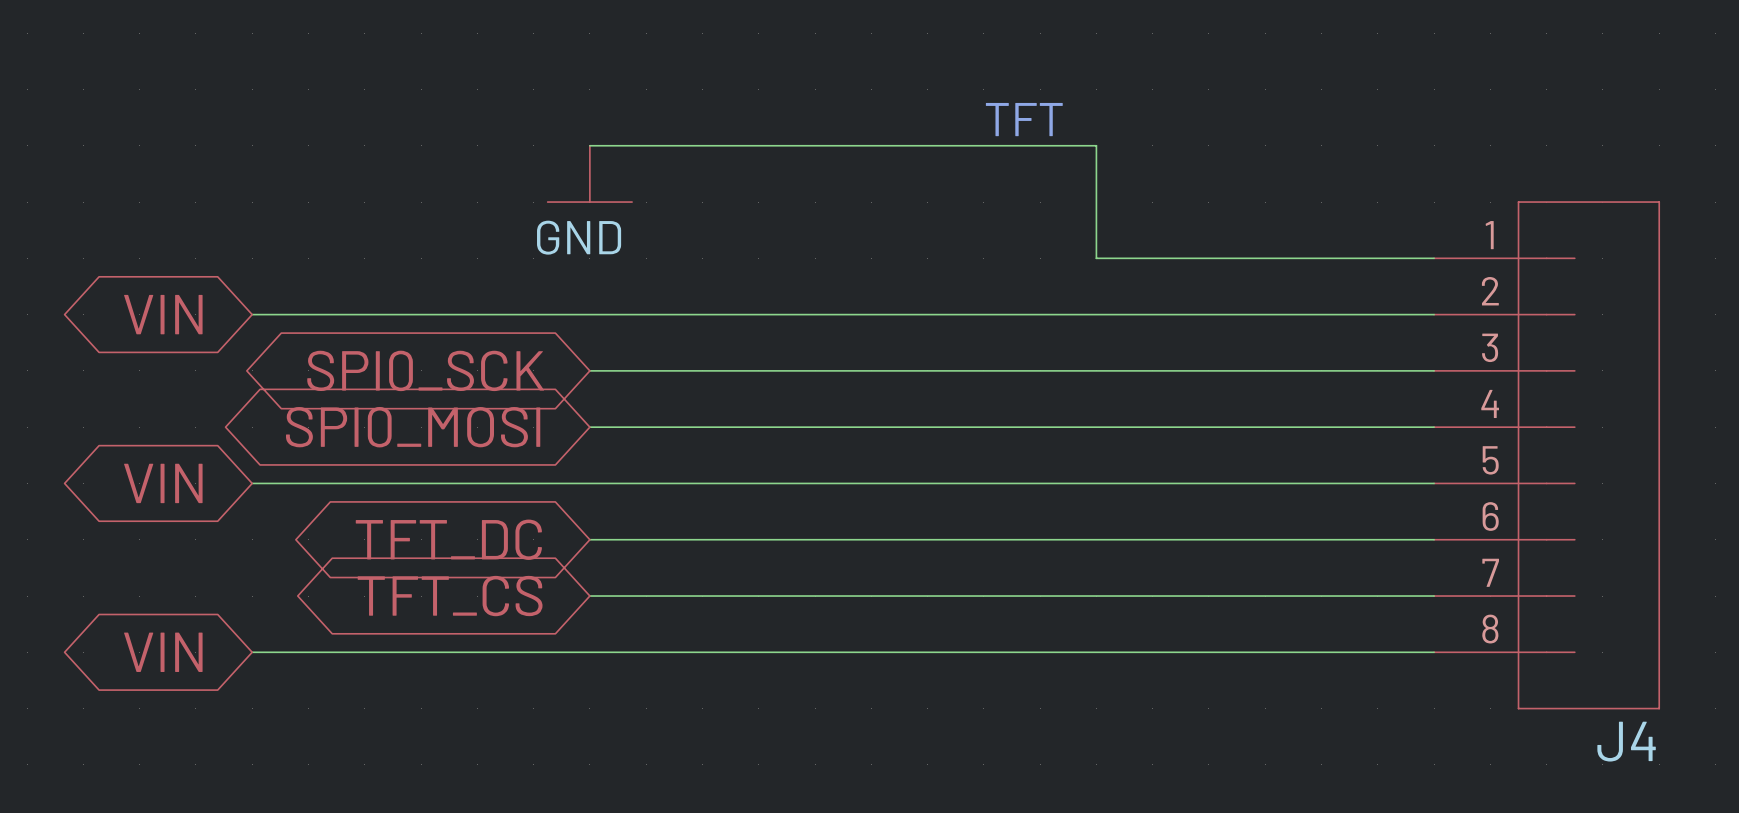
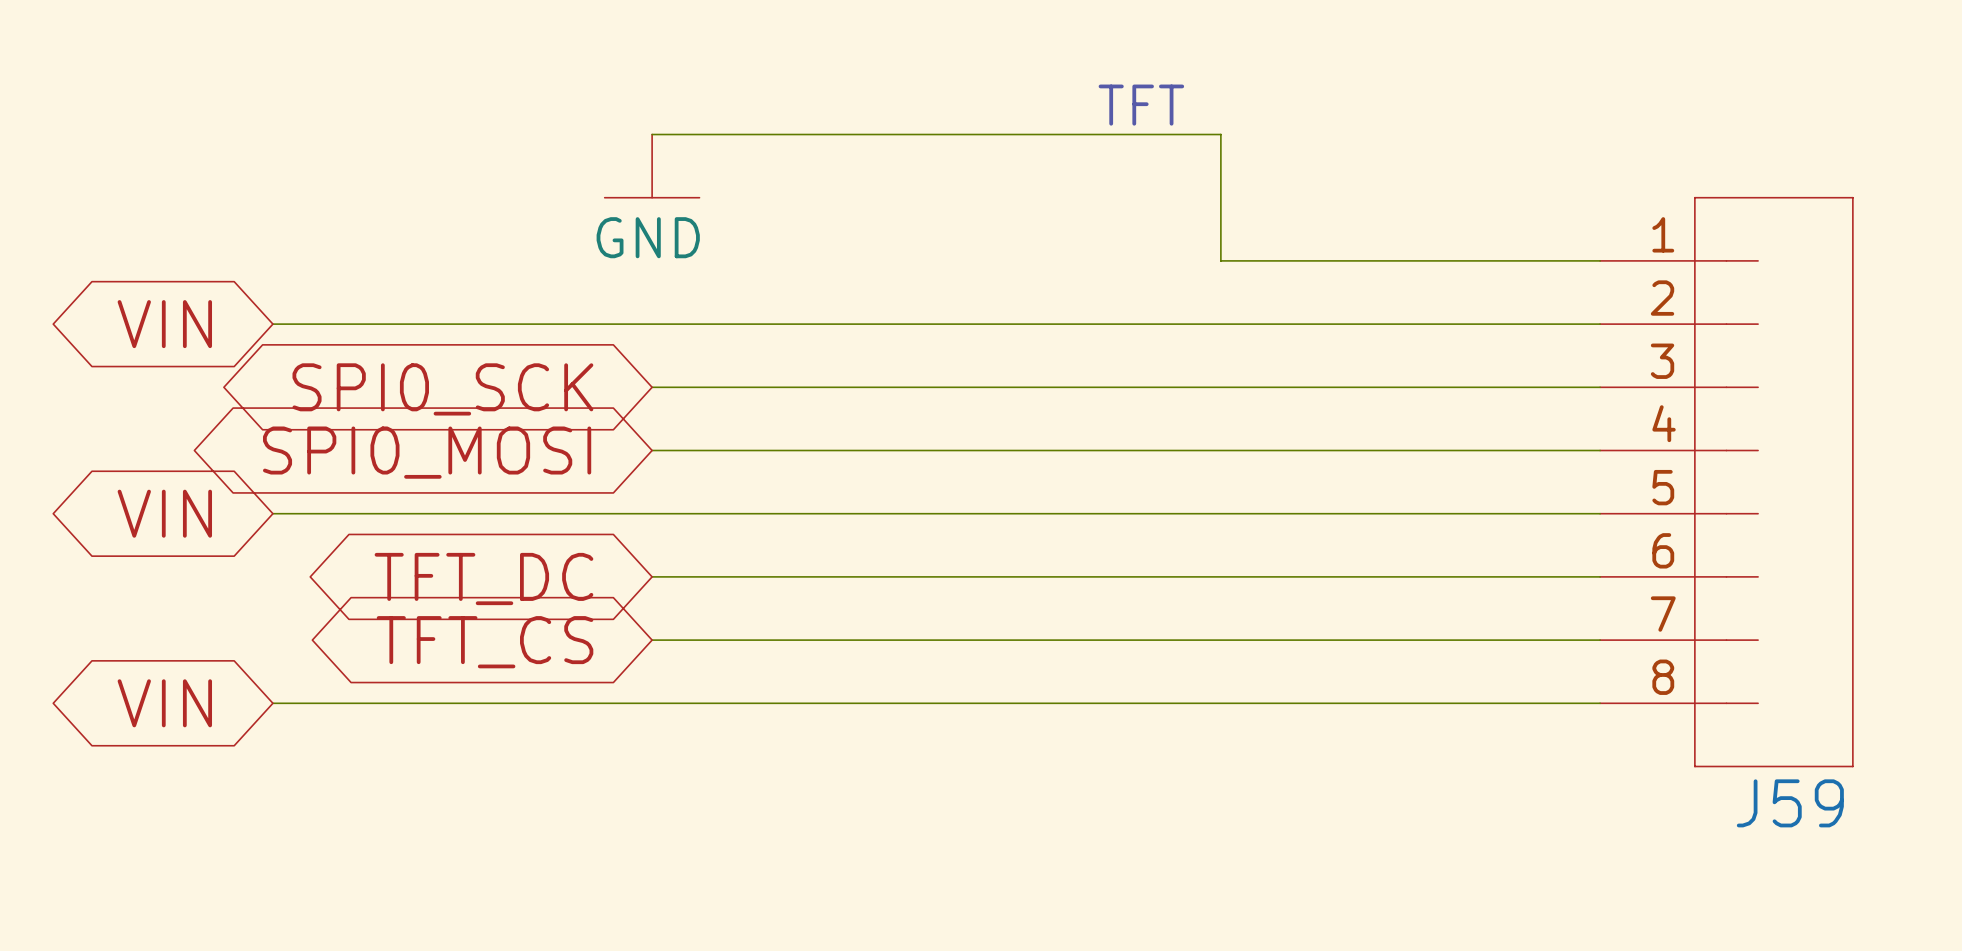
J4 name: J4 (1626, 741) -> J59 (1790, 803)

